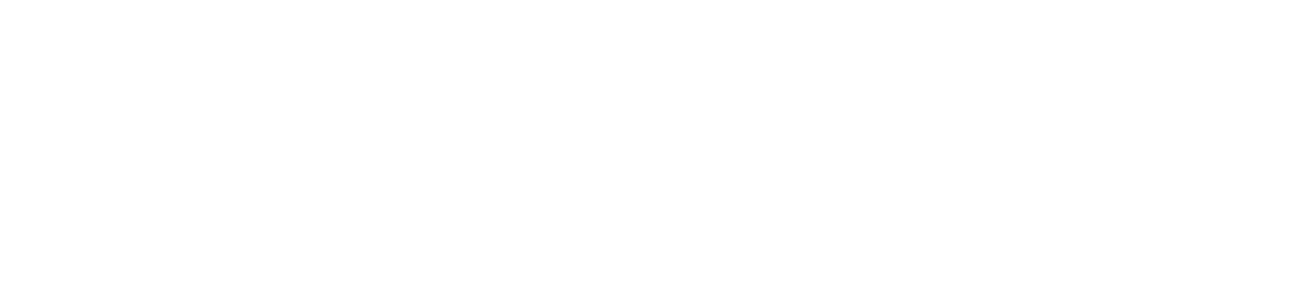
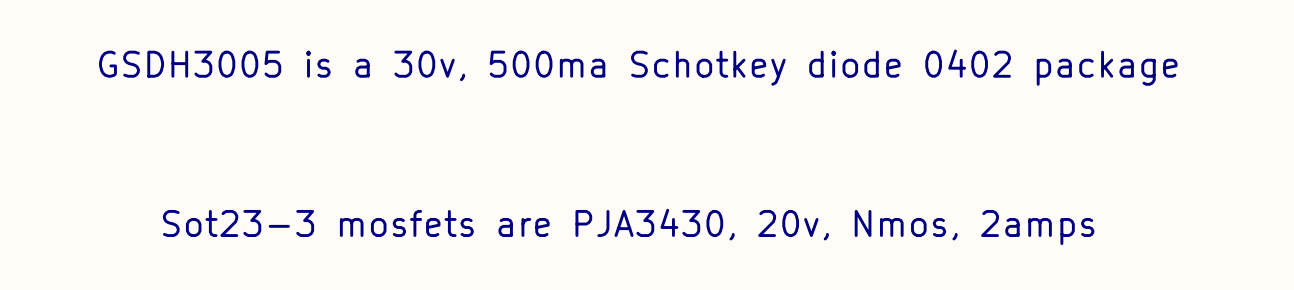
text: none -> GSDH3005 is a 30v, 500ma Schotkey diode 0402 package (638, 67)
text: none -> Sot23-3 mosfets are PJA3430, 20v, Nmos, 2amps (628, 226)

